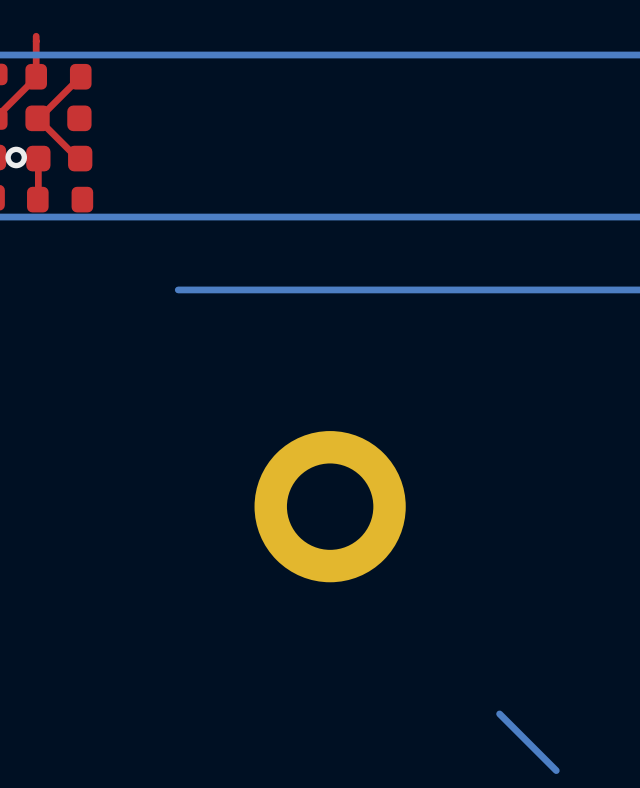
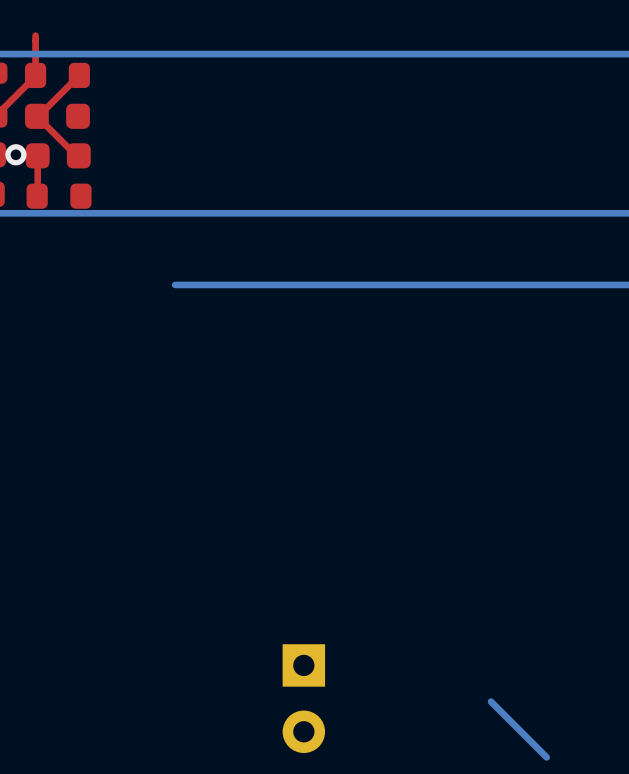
part: (330, 506) -> none
part: none -> (303, 698)

